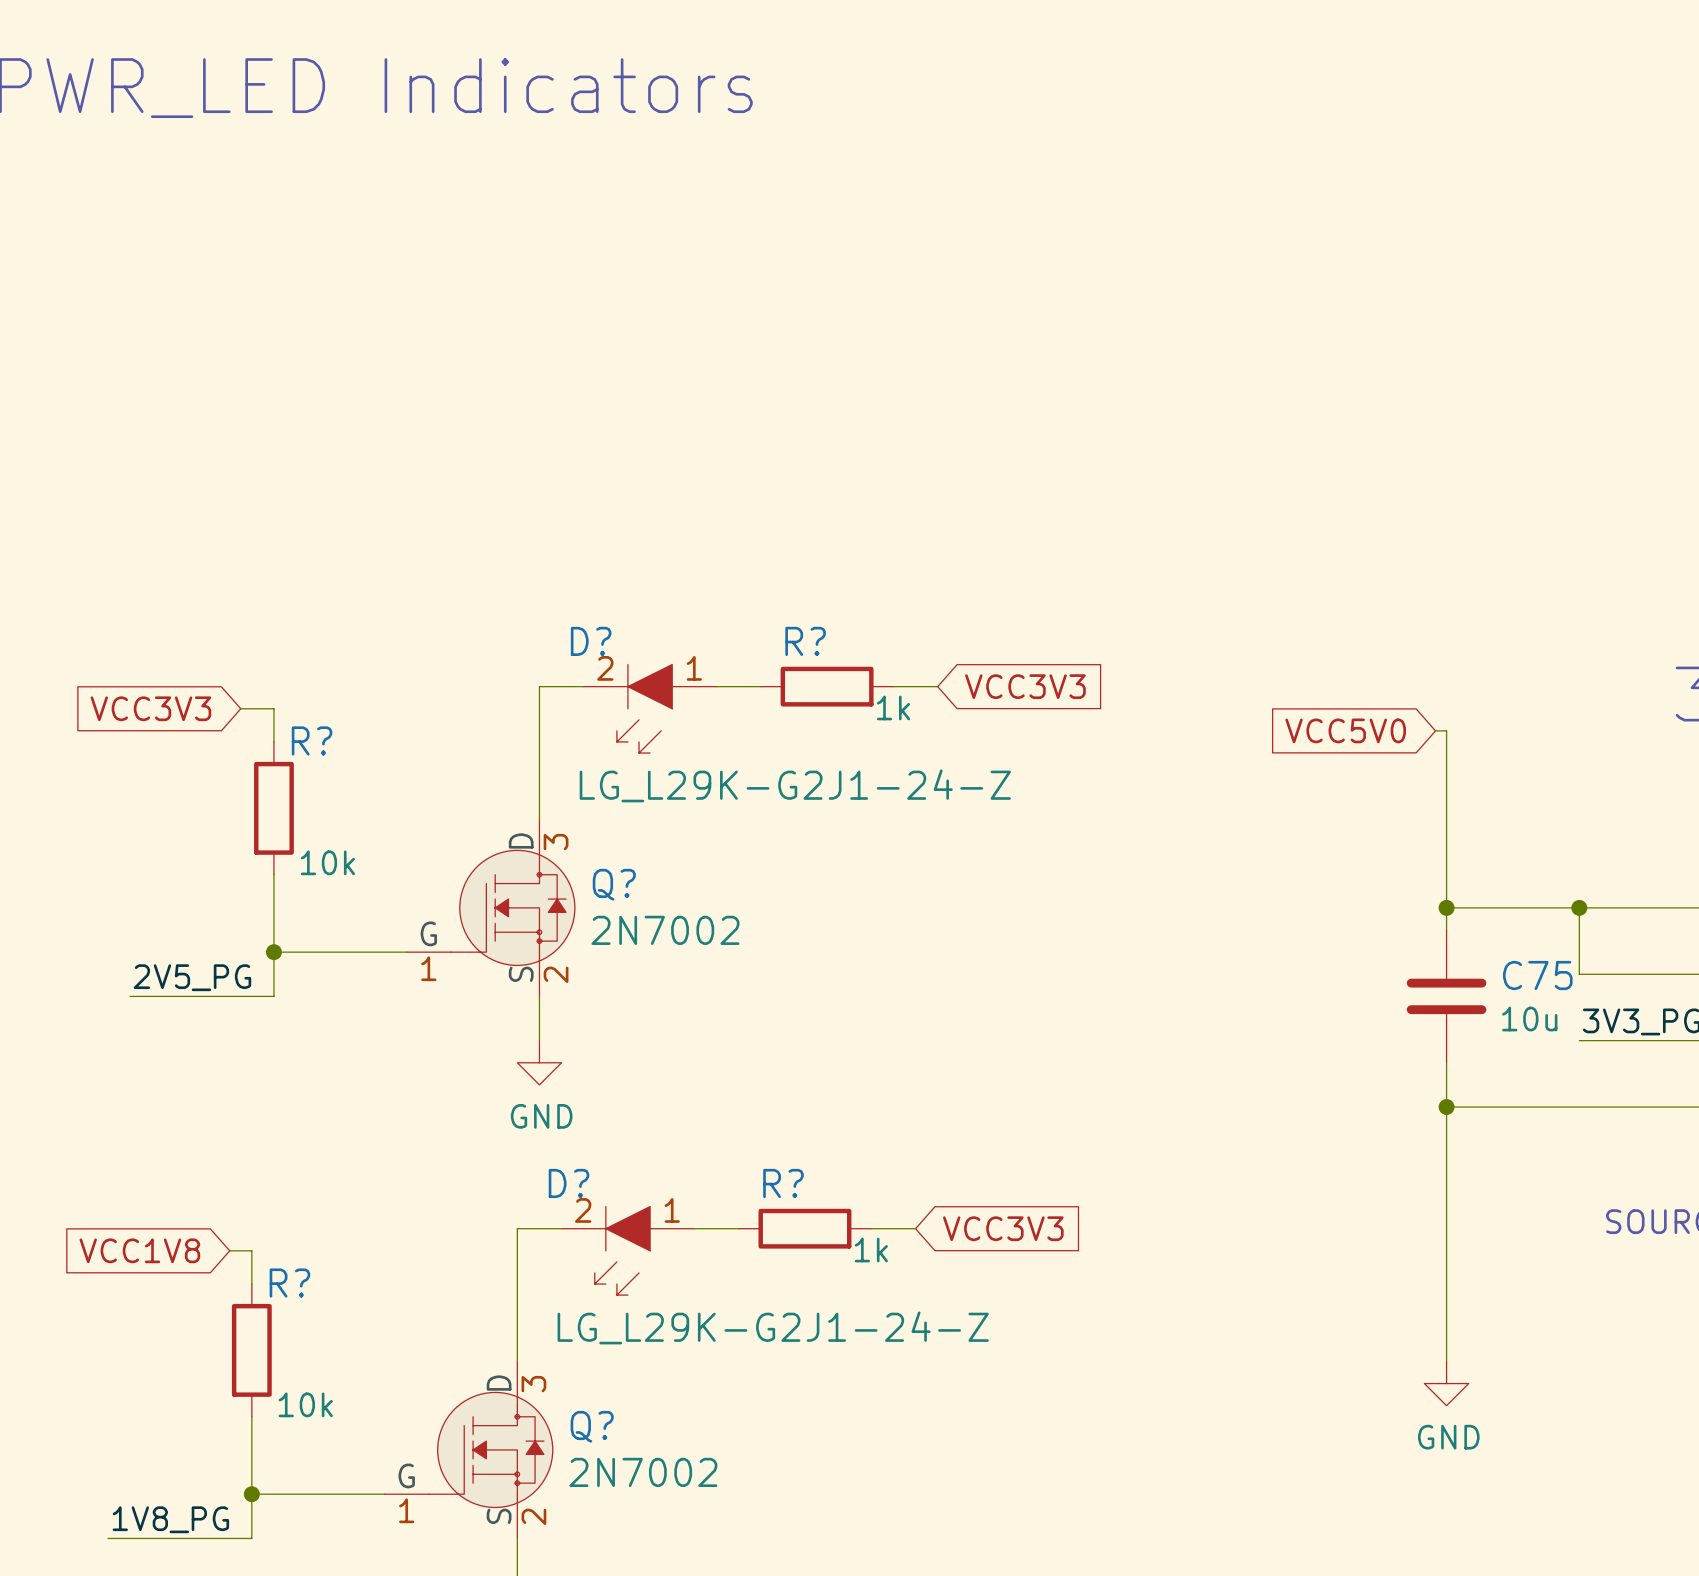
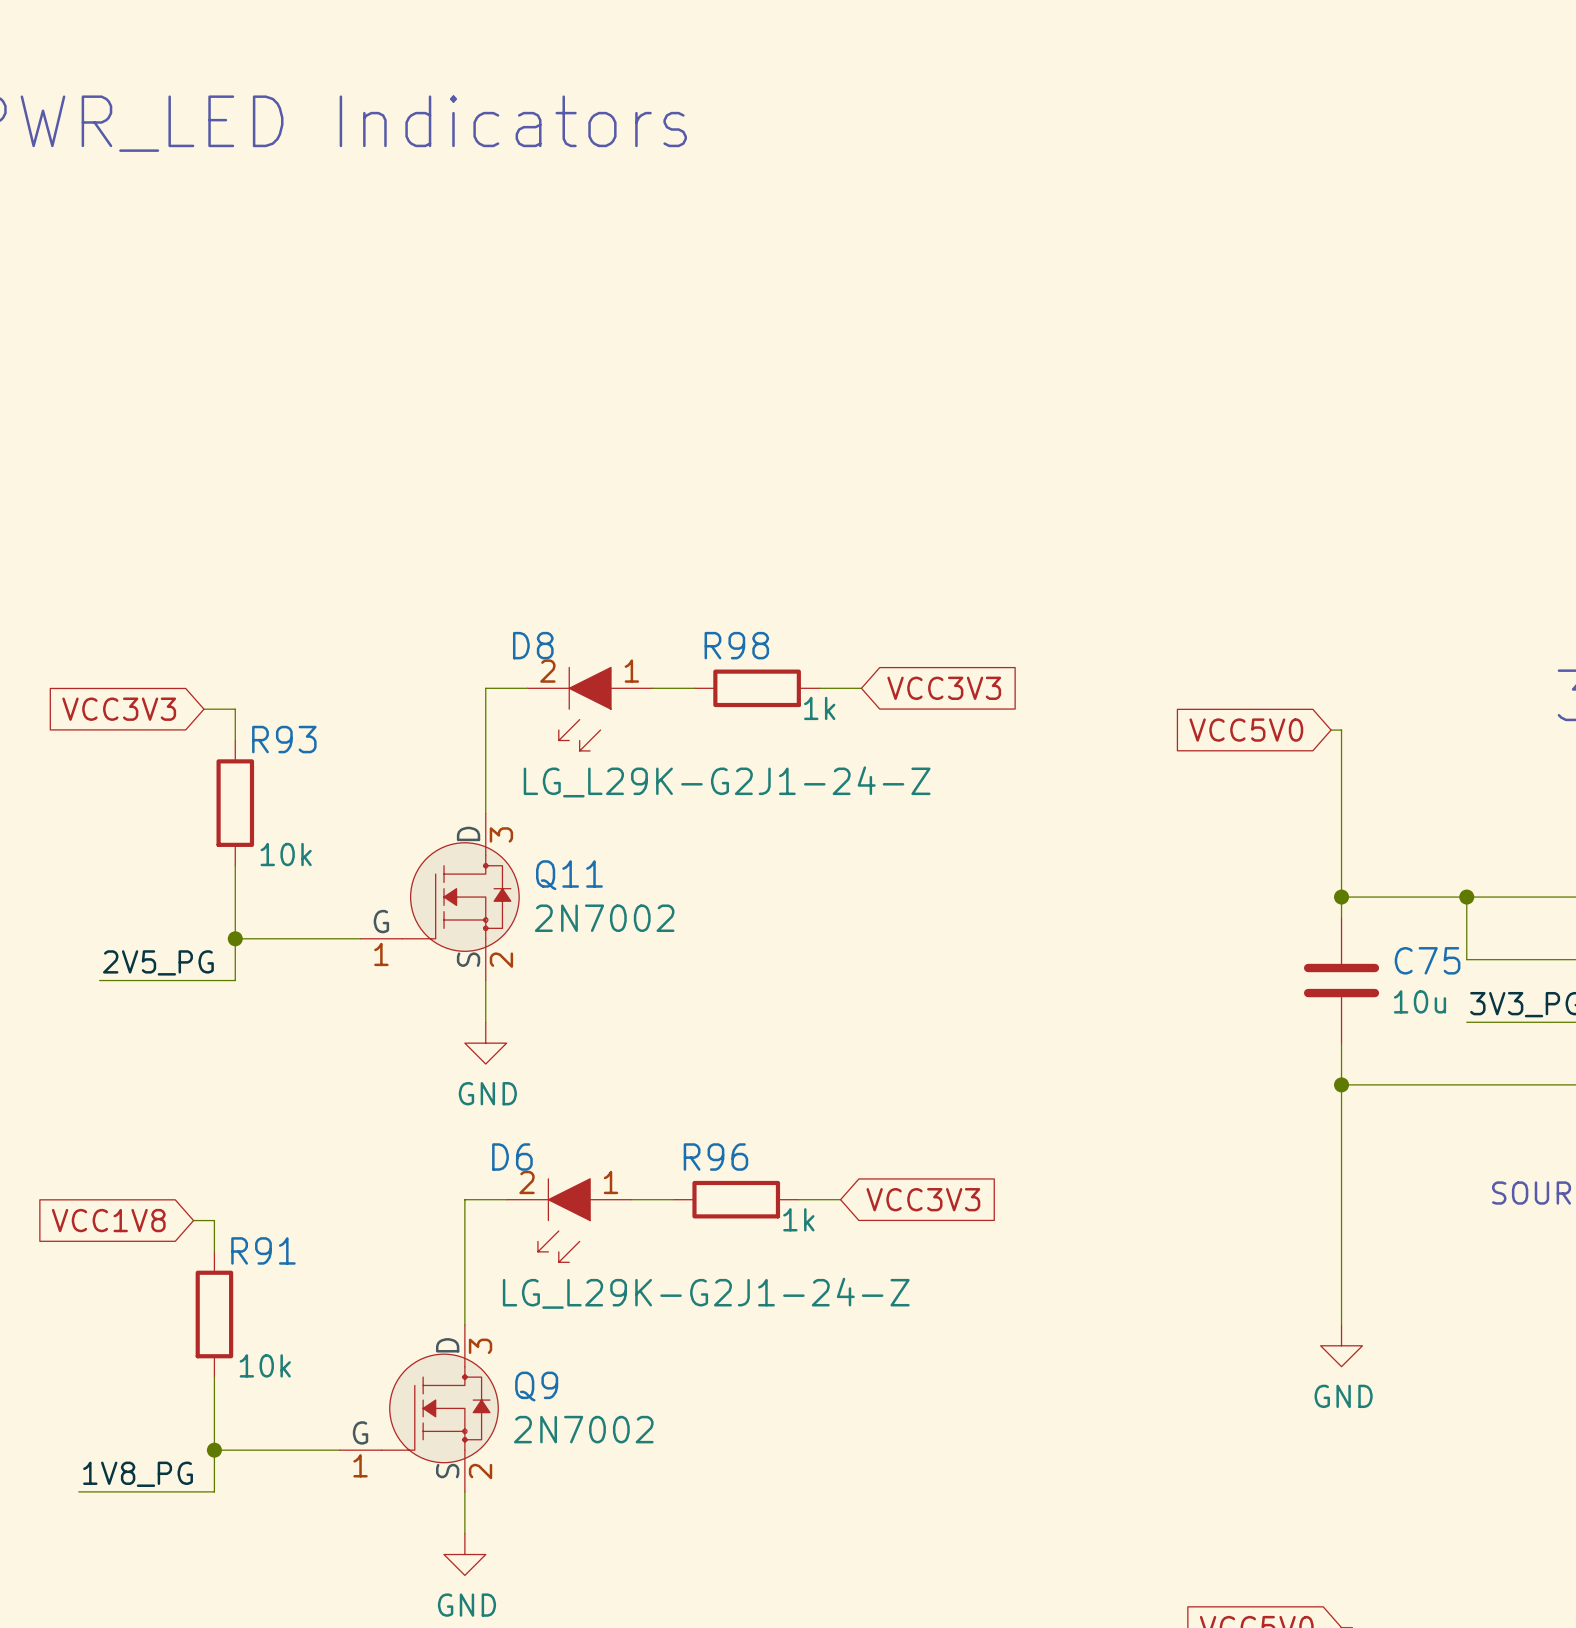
D? name: D? (591, 641) -> D8 (533, 645)
R? name: R? (805, 641) -> R98 (736, 645)
R? name: R? (312, 740) -> R93 (284, 739)
Q? name: Q? (614, 884) -> Q11 (569, 875)
D? name: D? (569, 1183) -> D6 (512, 1157)
R? name: R? (783, 1183) -> R96 (715, 1157)
R? name: R? (289, 1283) -> R91 (263, 1250)
Q? name: Q? (592, 1426) -> Q9 (536, 1386)

